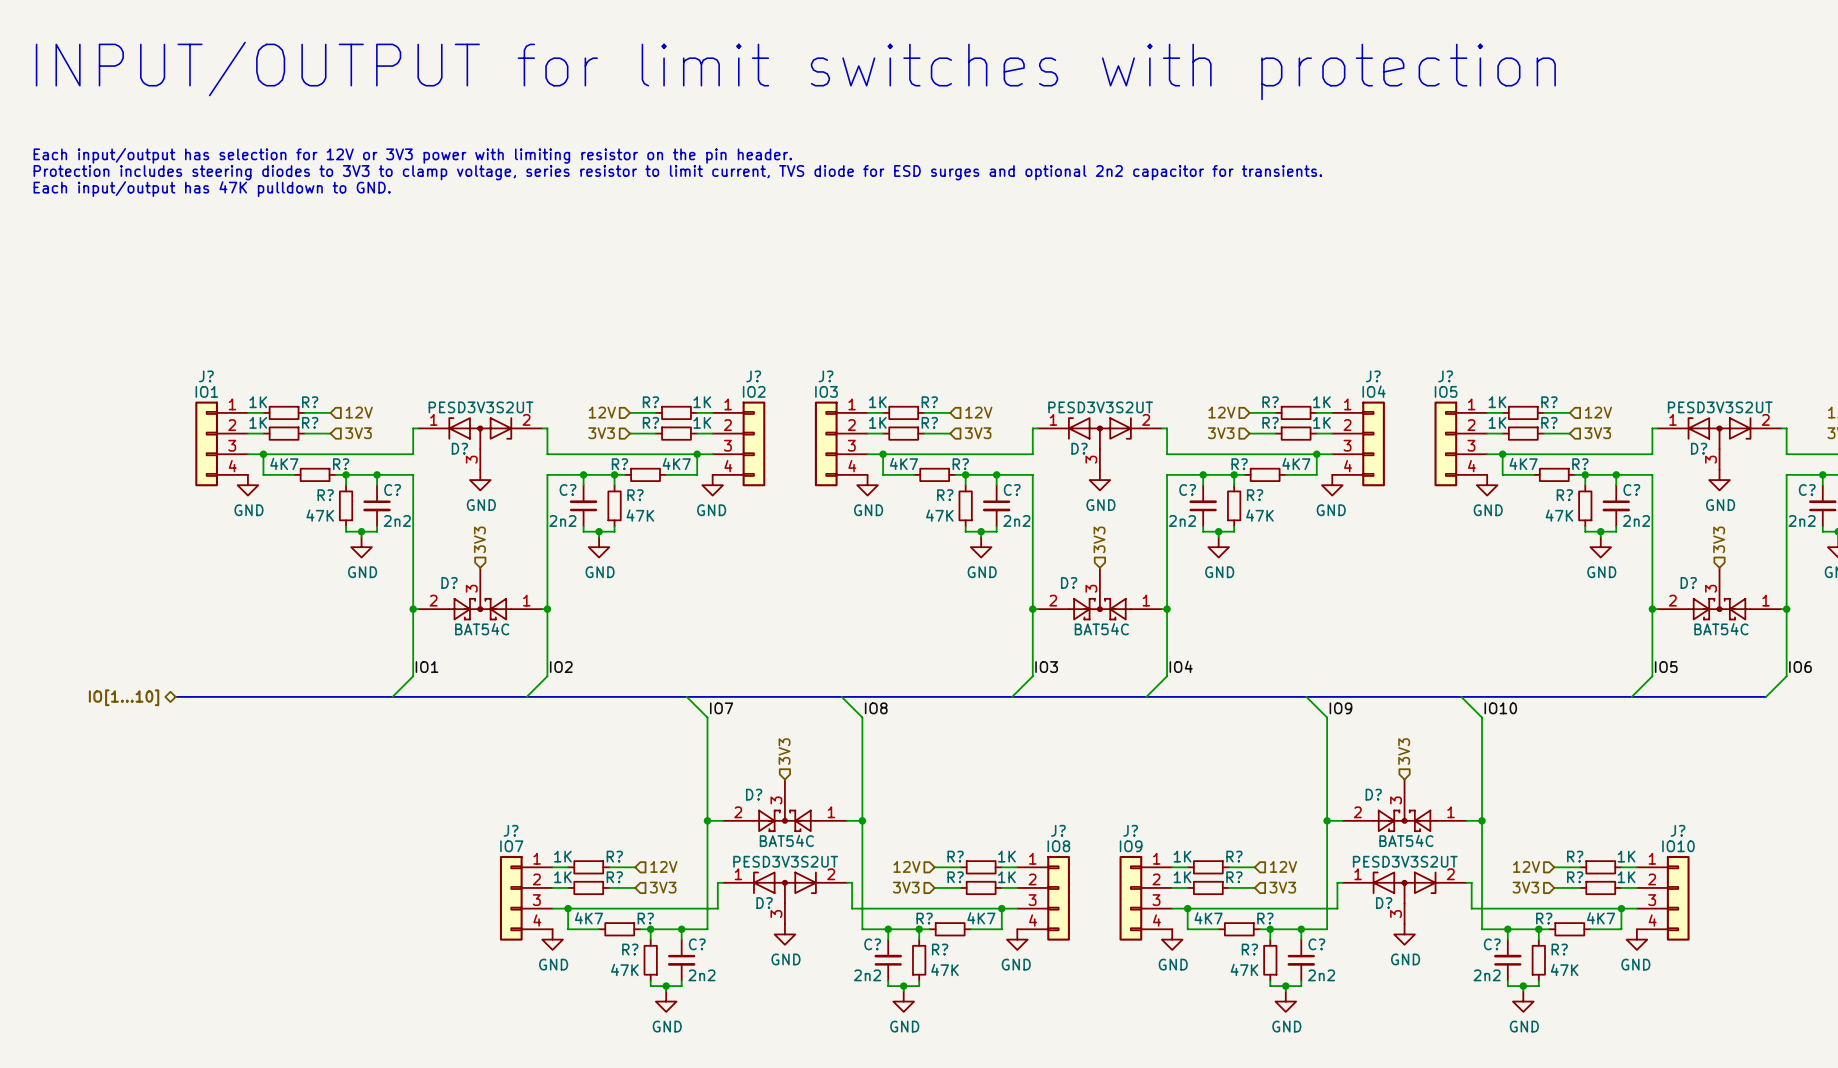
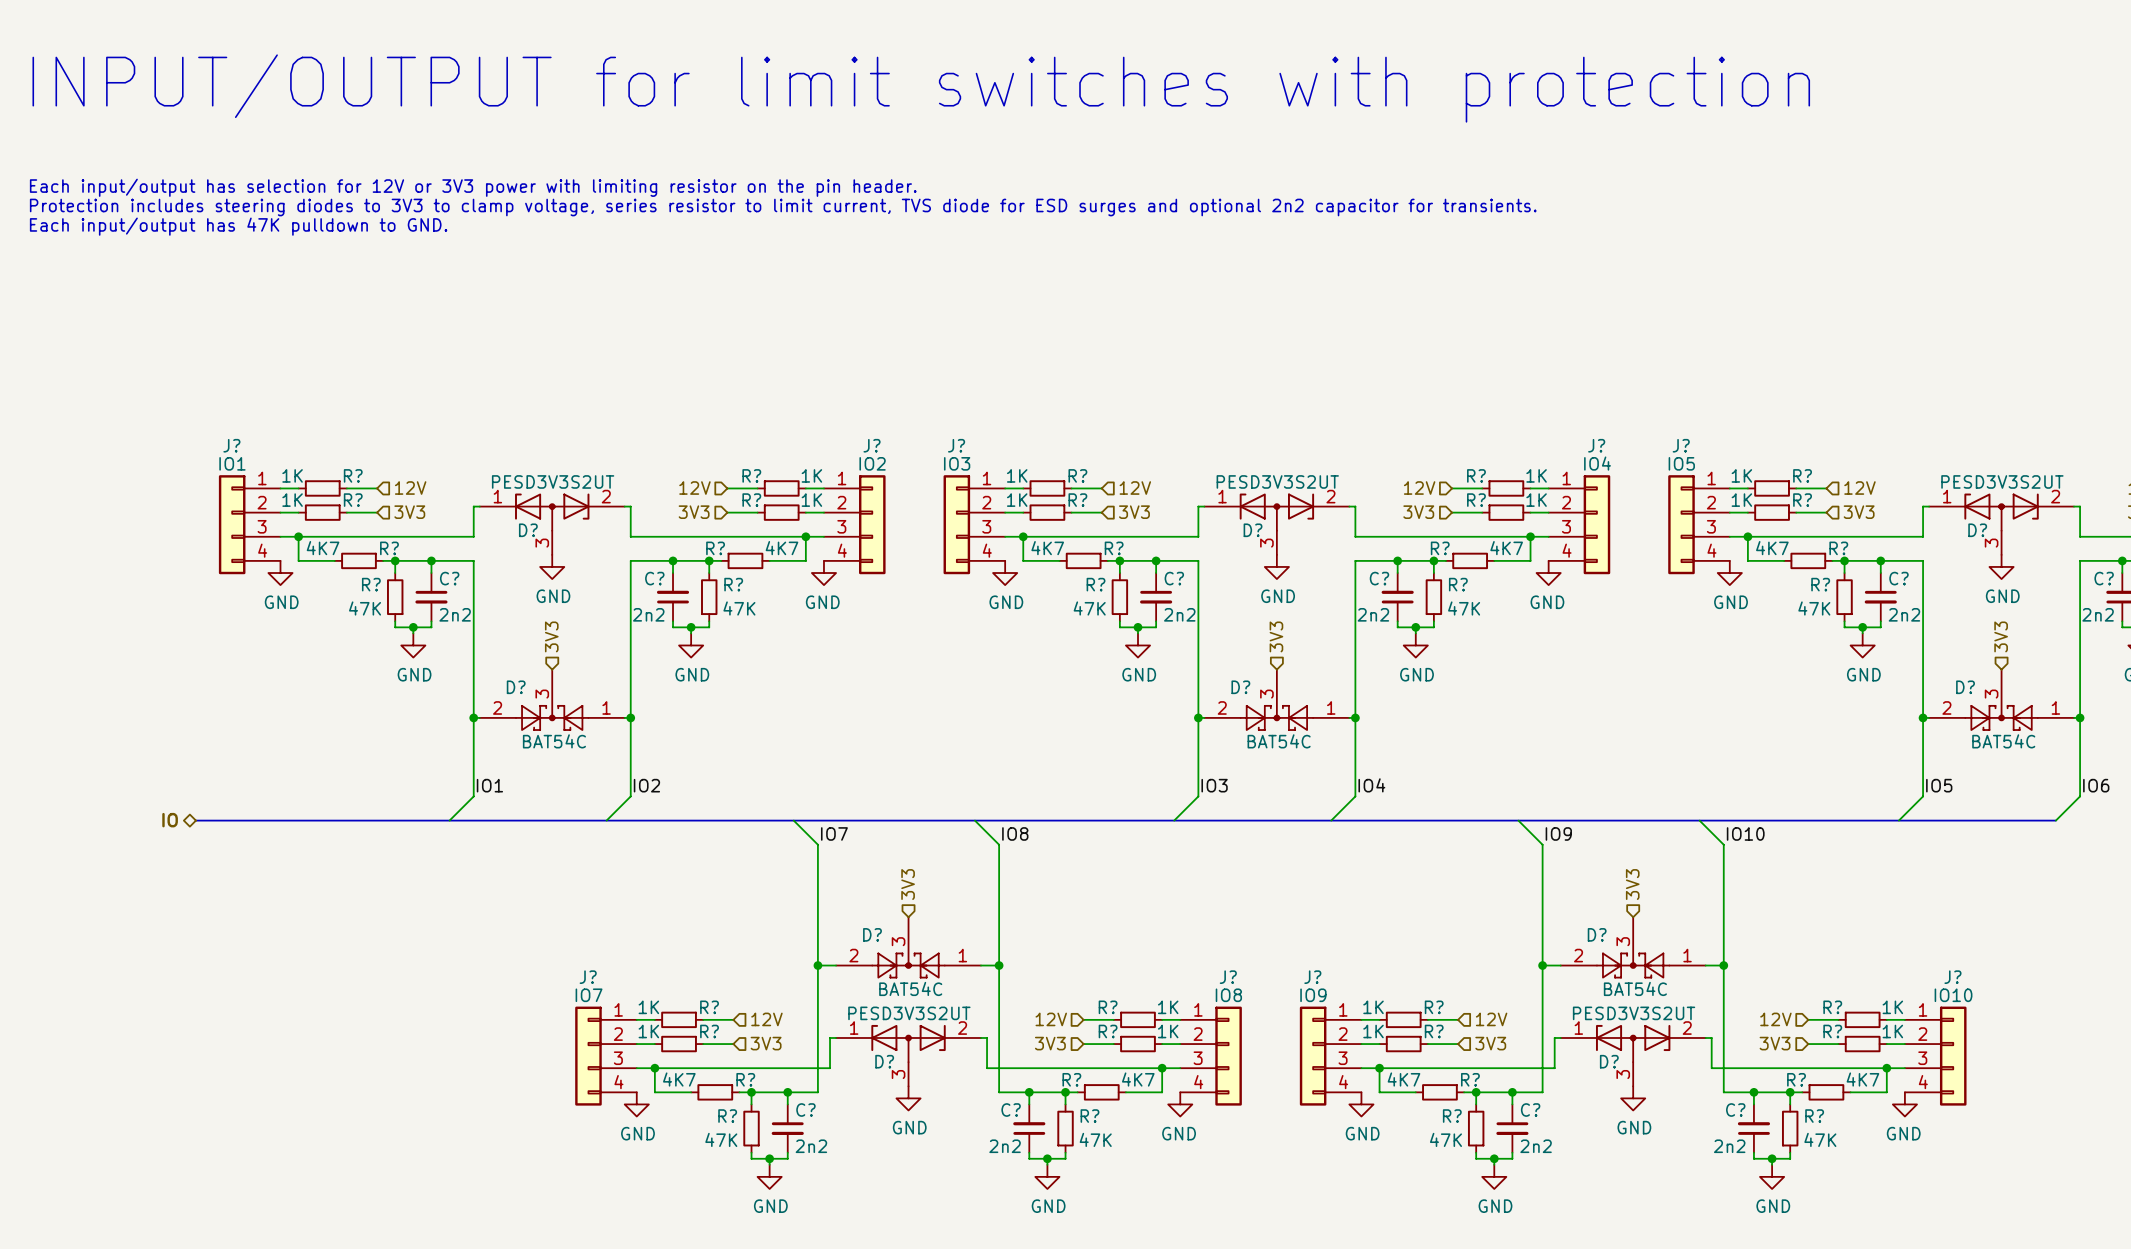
hierarchical label: IO[1...10] (124, 697) -> IO (170, 820)

